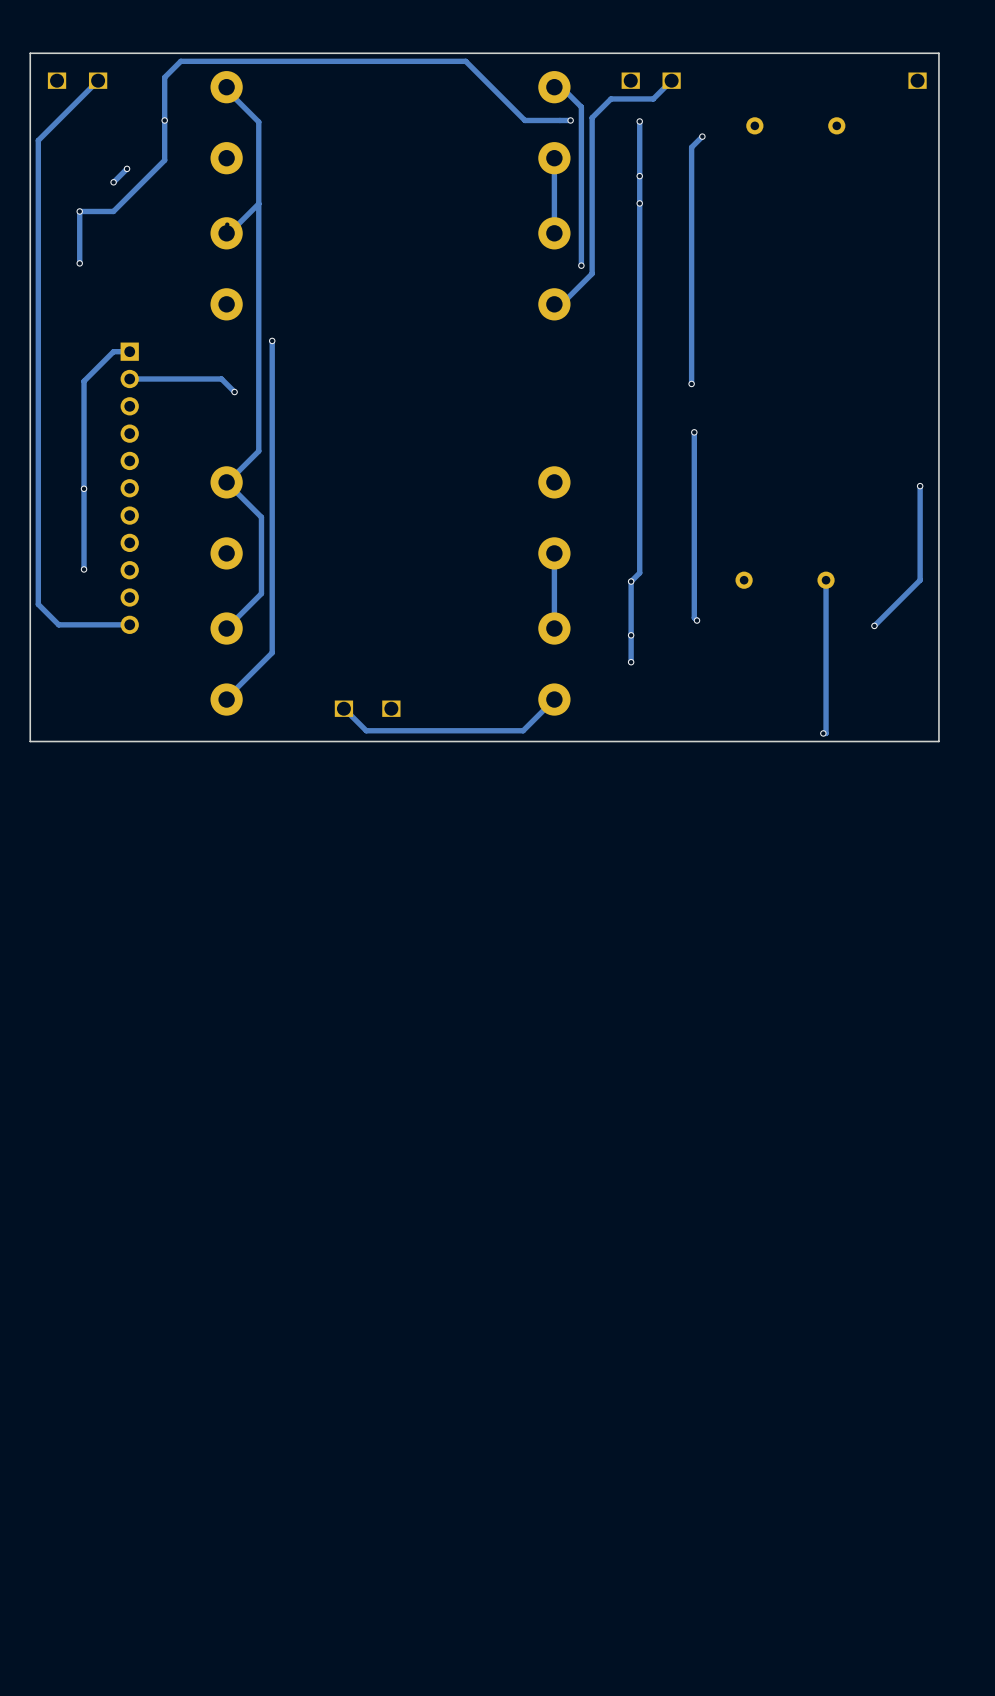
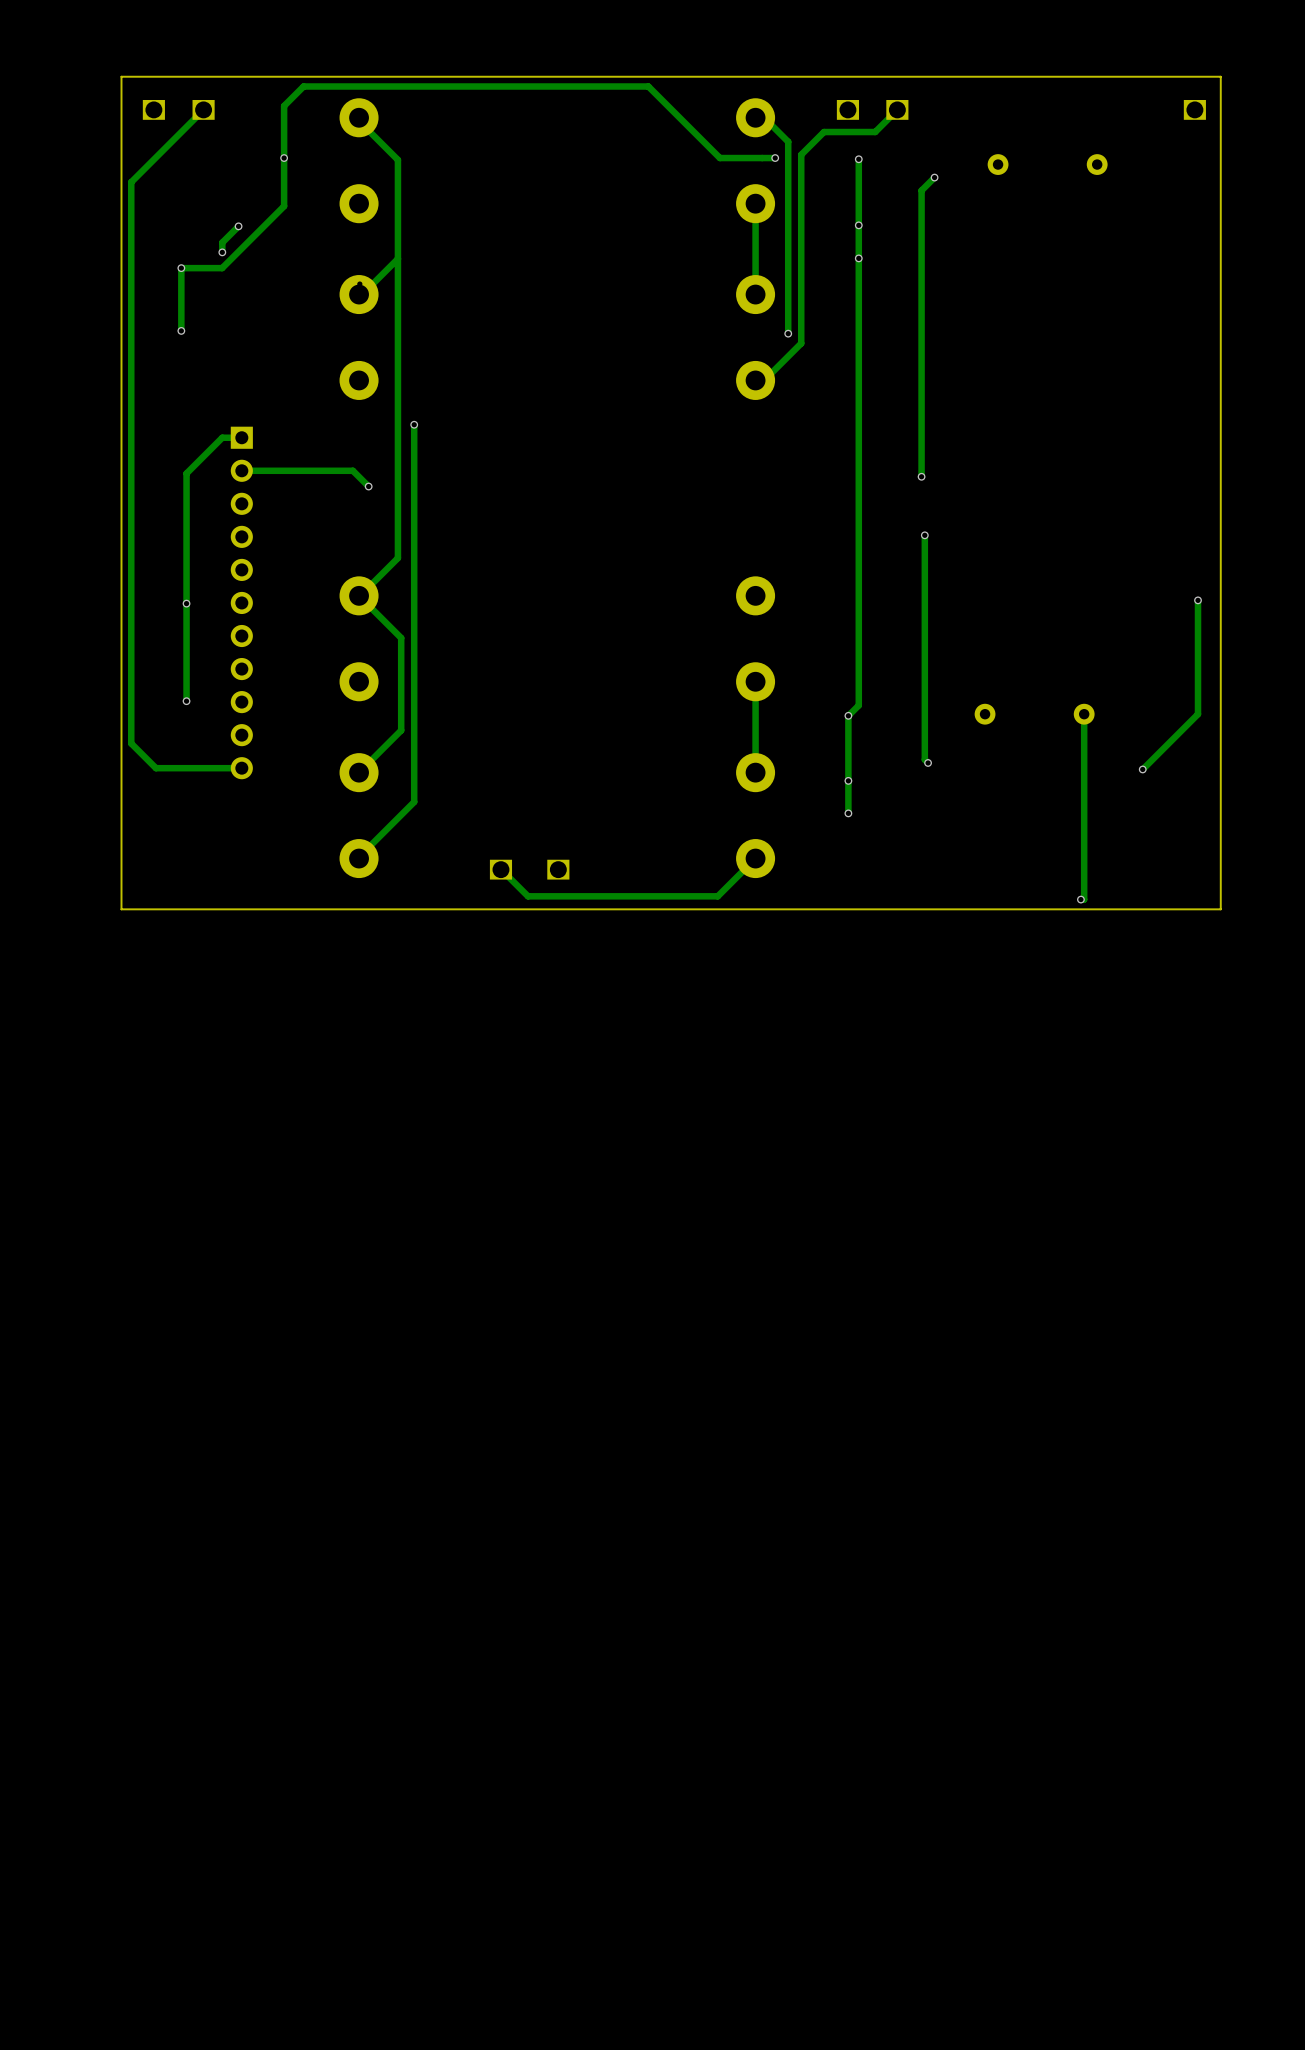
track: (127, 168) (113, 182) -> none
via: (127, 168) -> none
track: none -> (238, 226) (222, 242) (222, 252)
via: none -> (238, 226)
via: (113, 182) -> none
via: none -> (222, 252)

